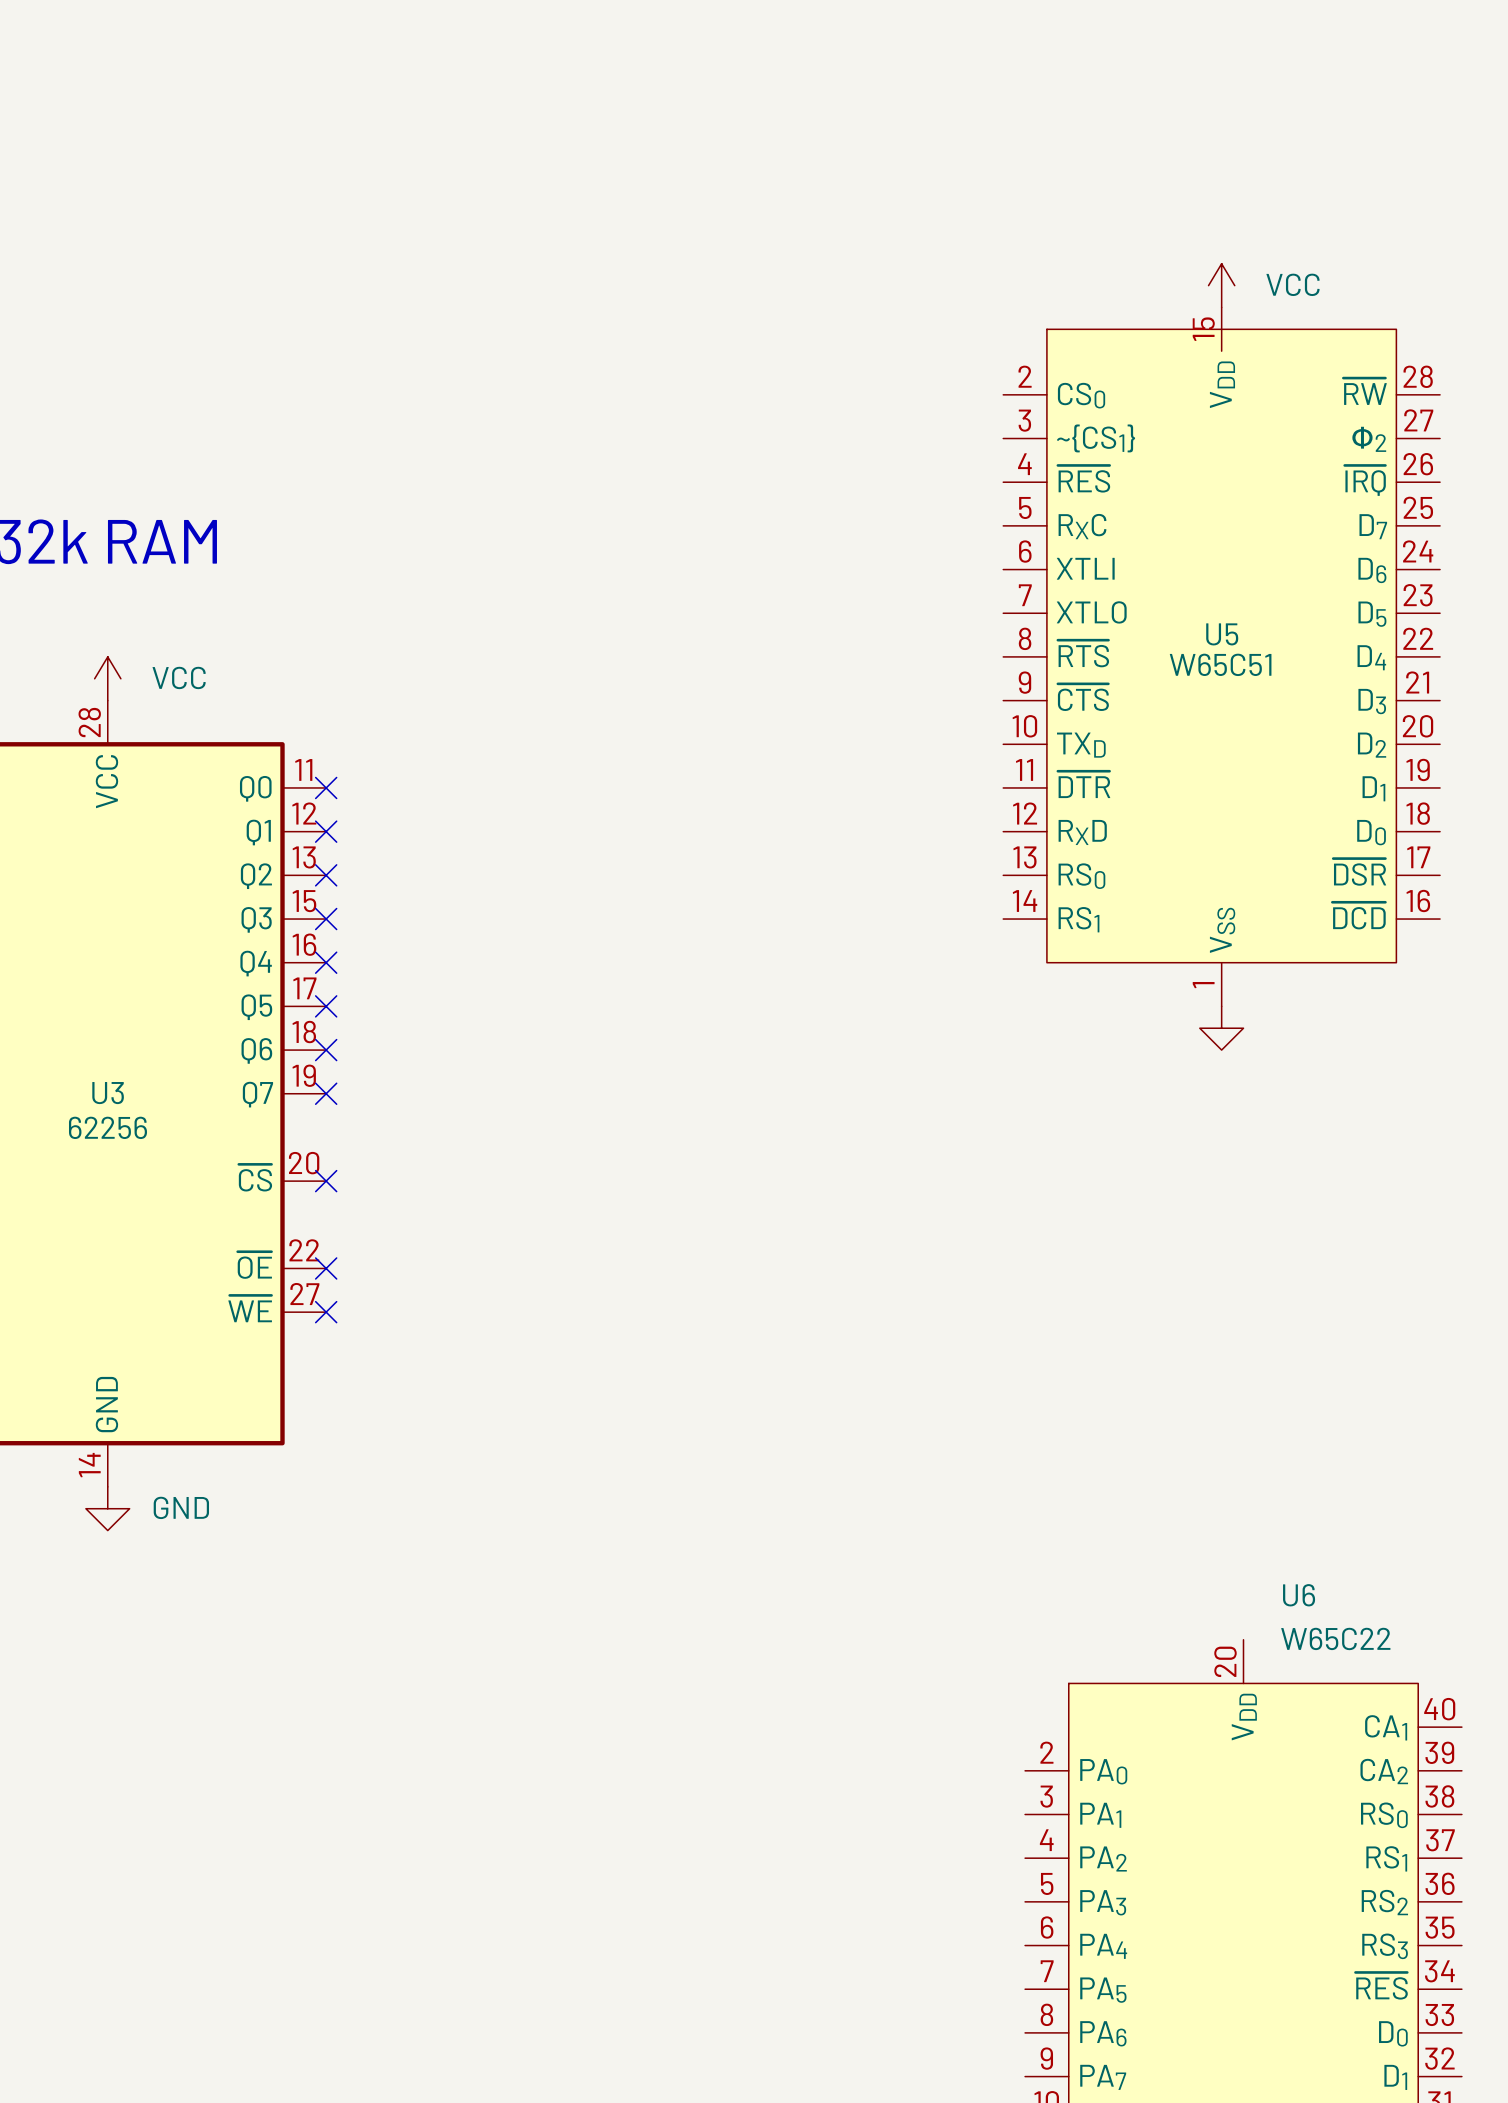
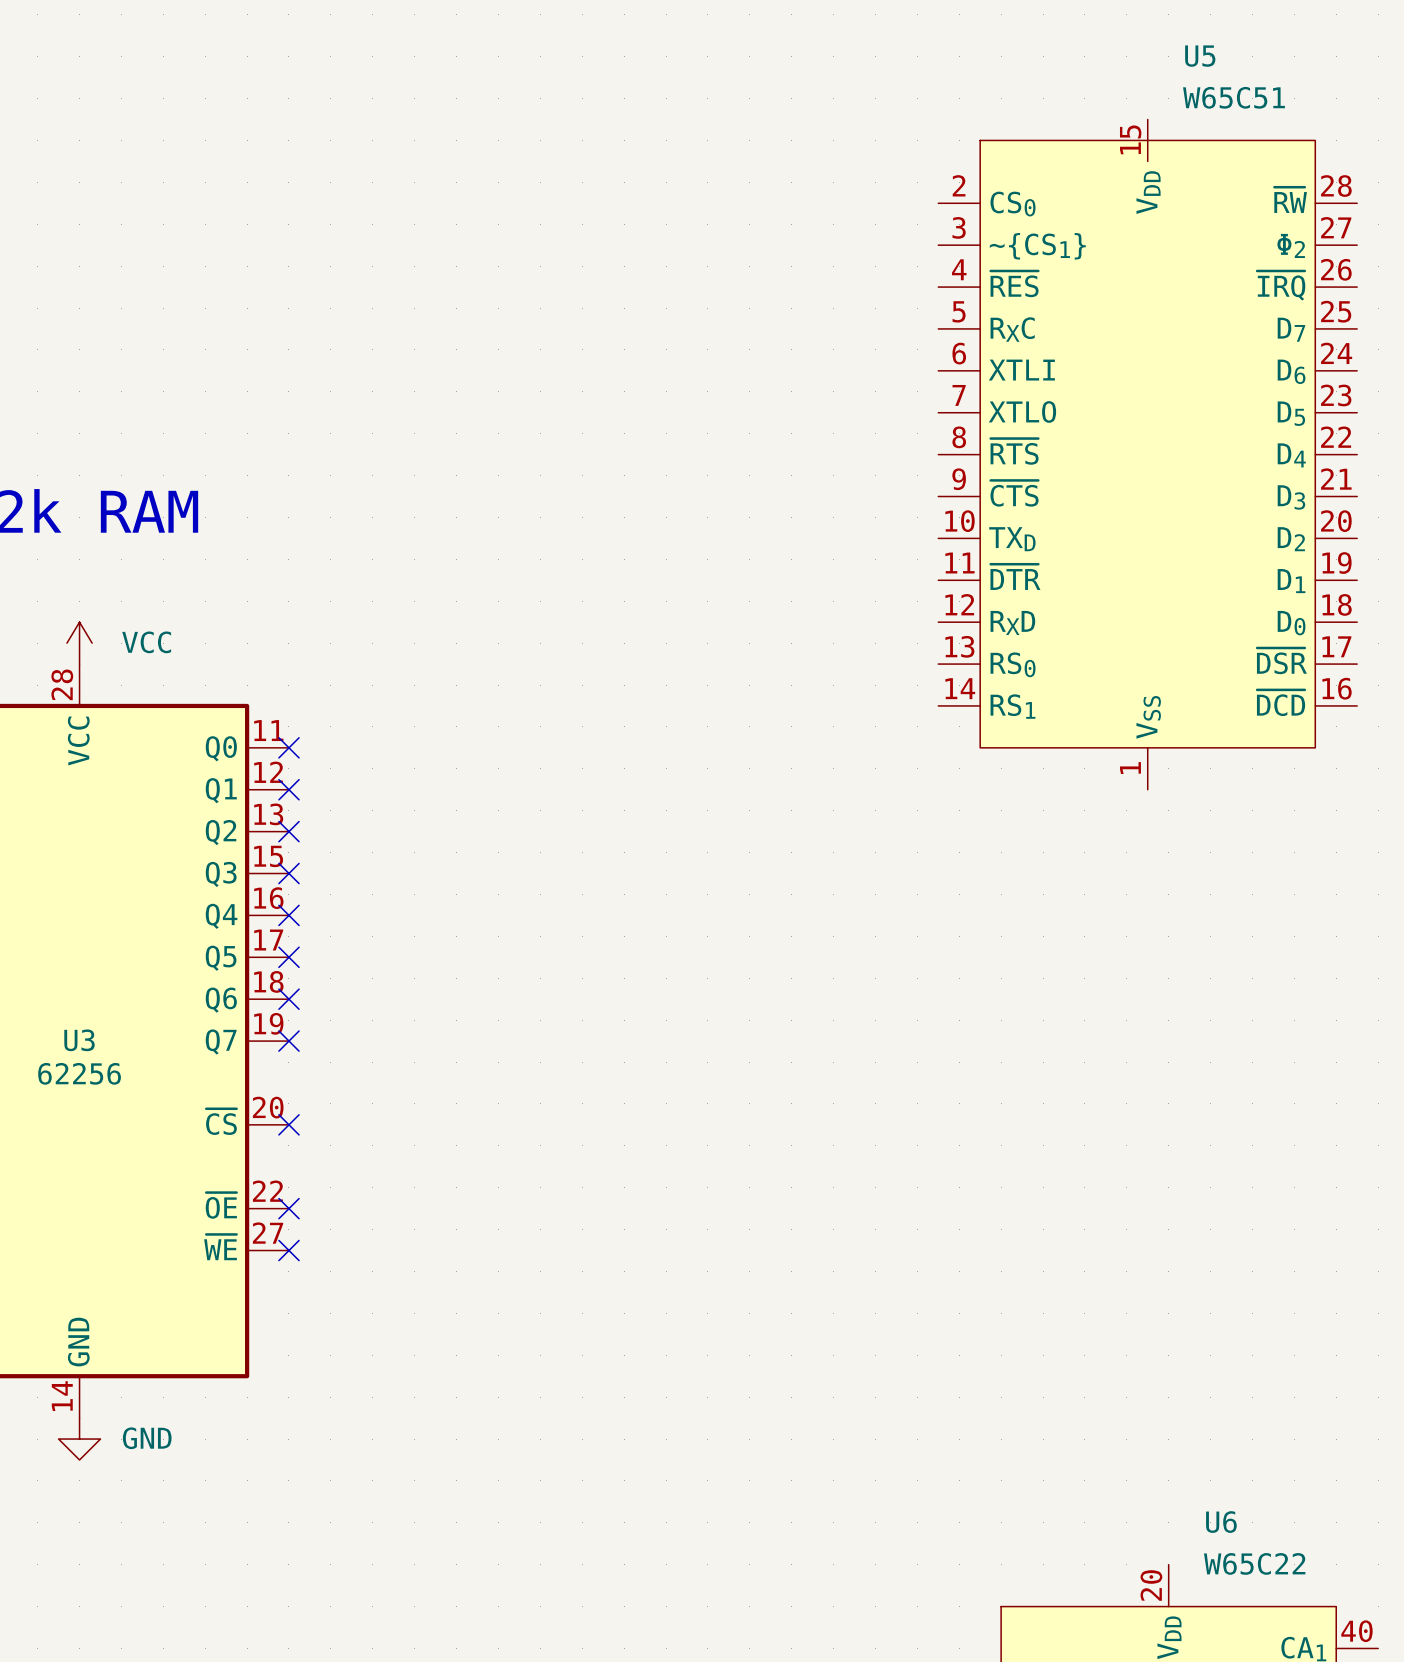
power symbol: VCC (1221, 285) -> none
U5 name position: U5 (1222, 634) -> U5 (1200, 56)
U5 position: (1221, 656) -> (1147, 454)
U5 value position: W65C51 (1220, 664) -> W65C51 (1233, 97)
power symbol: (1221, 1028) -> none

